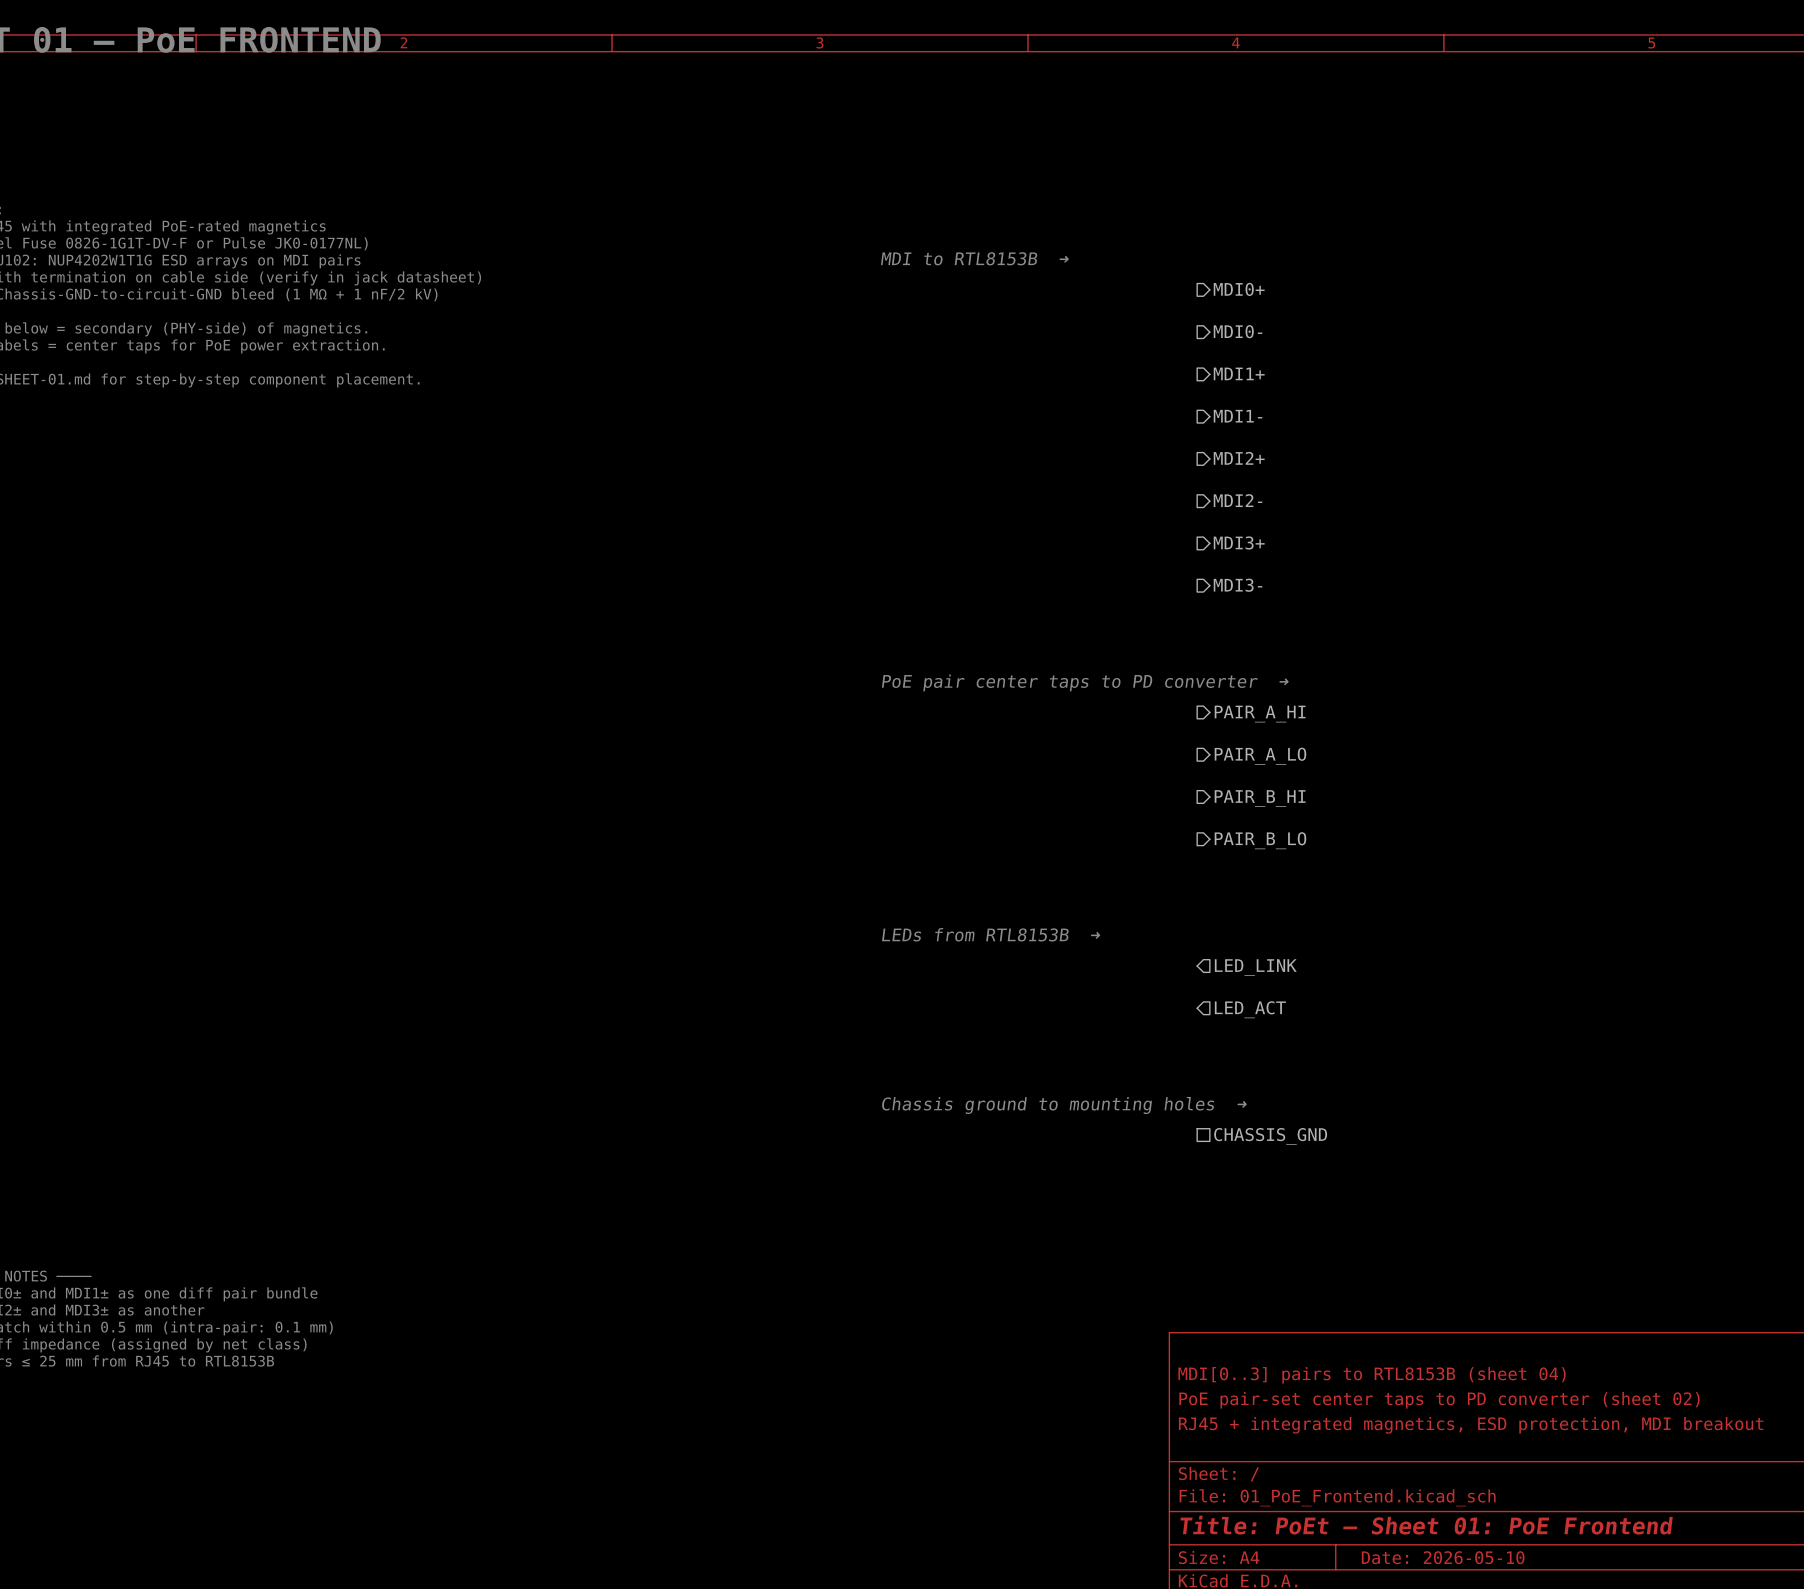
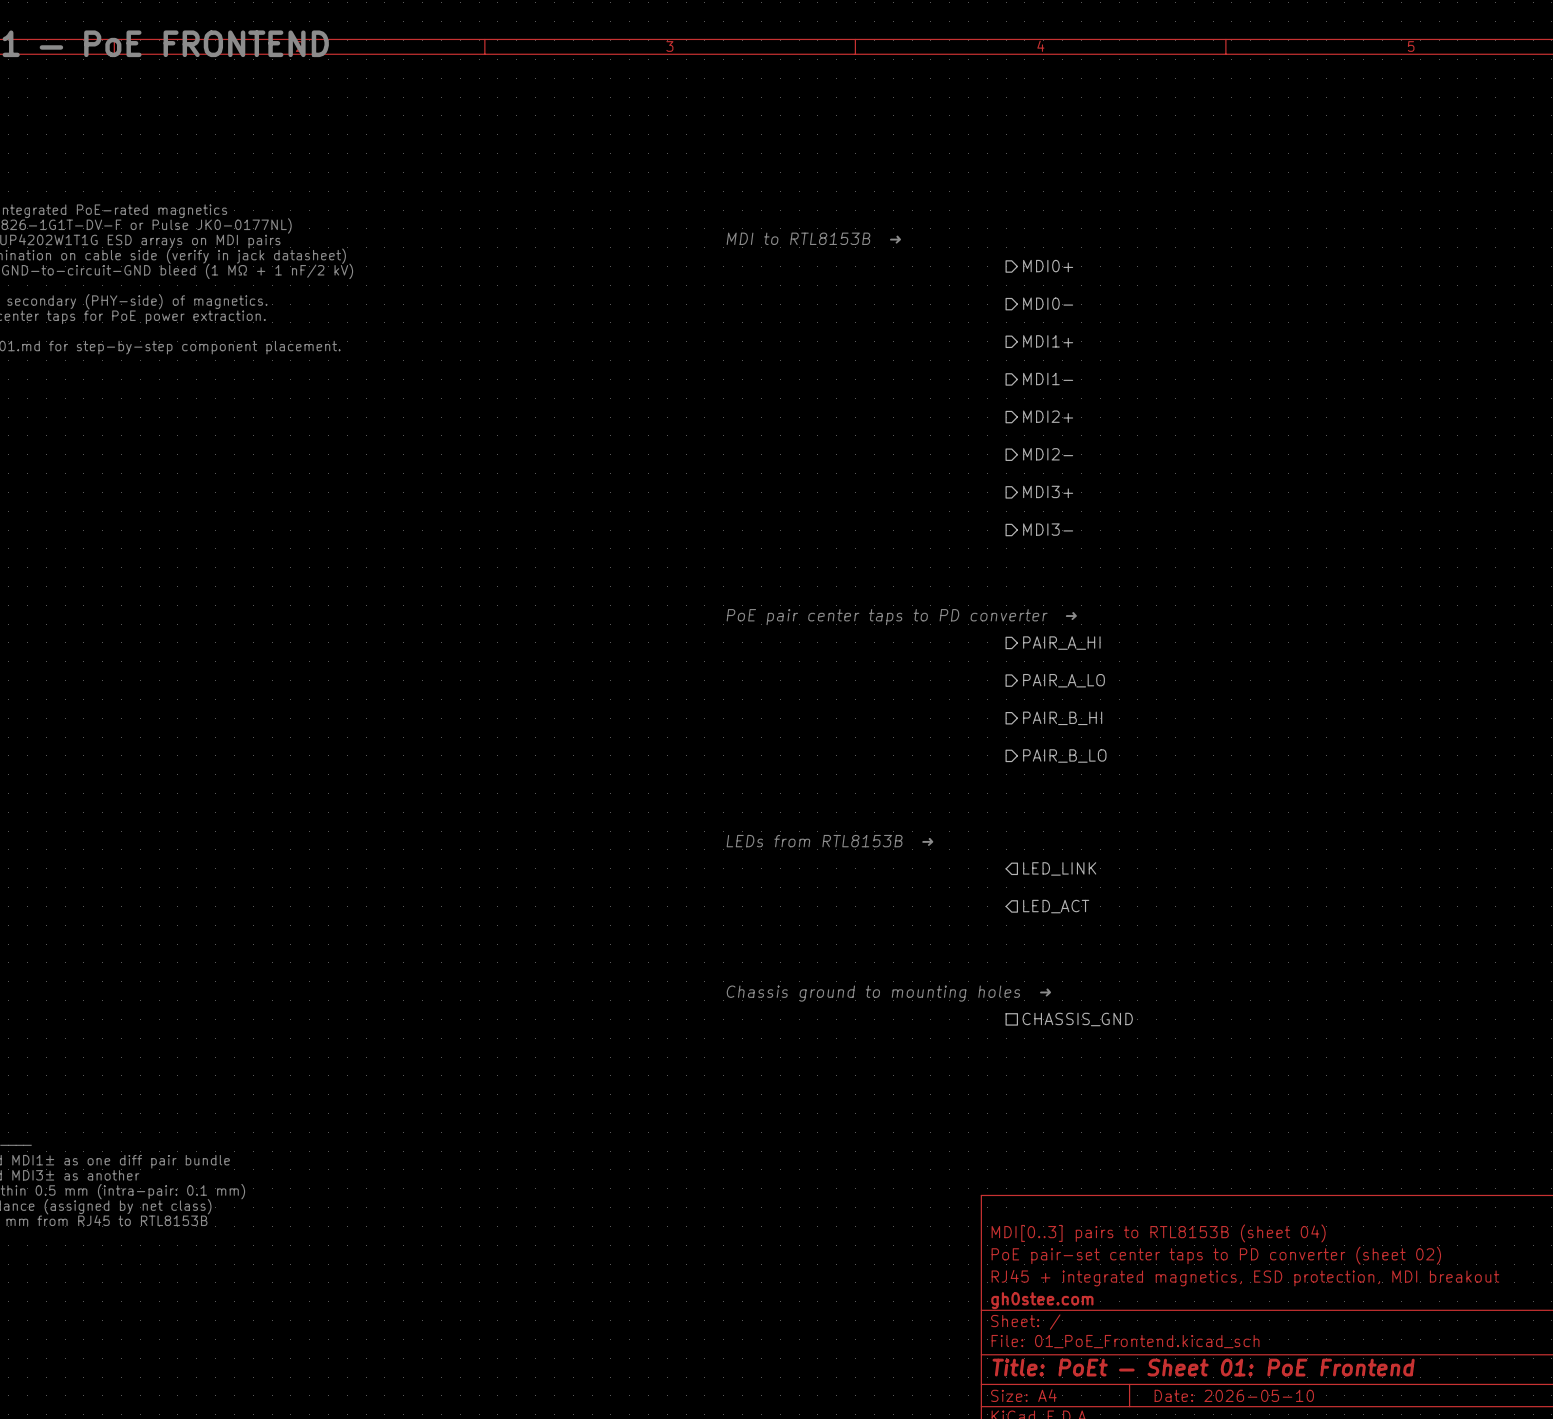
title block: none -> gh0stee.com (1042, 1300)

